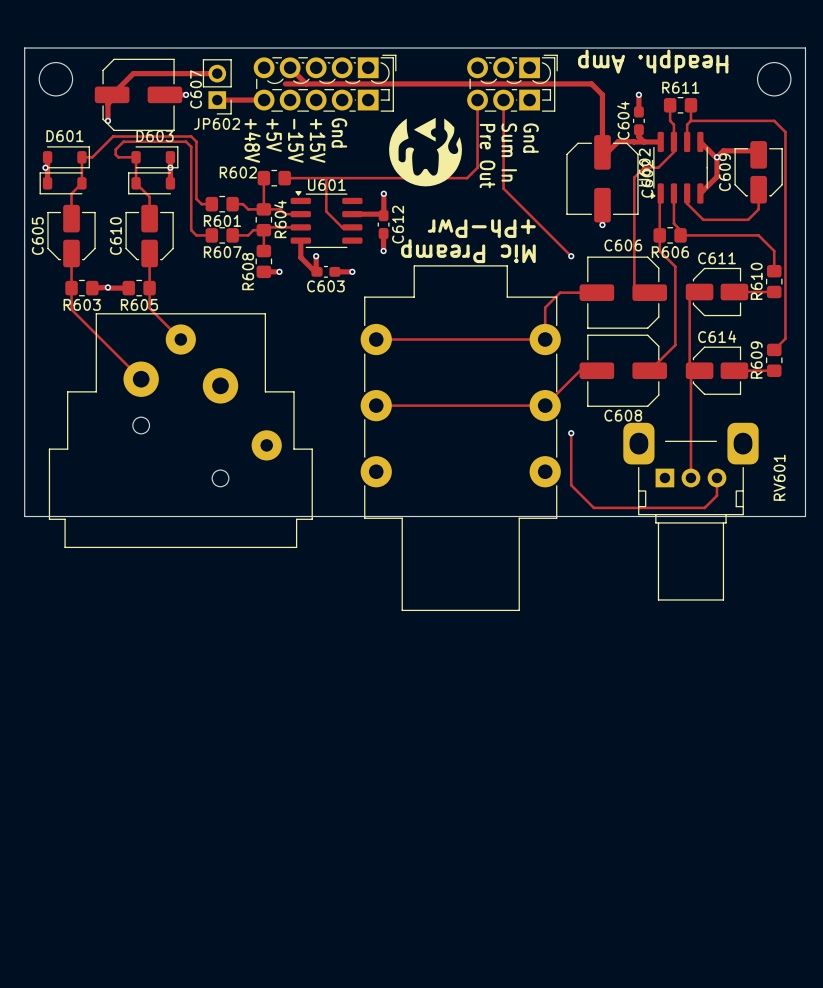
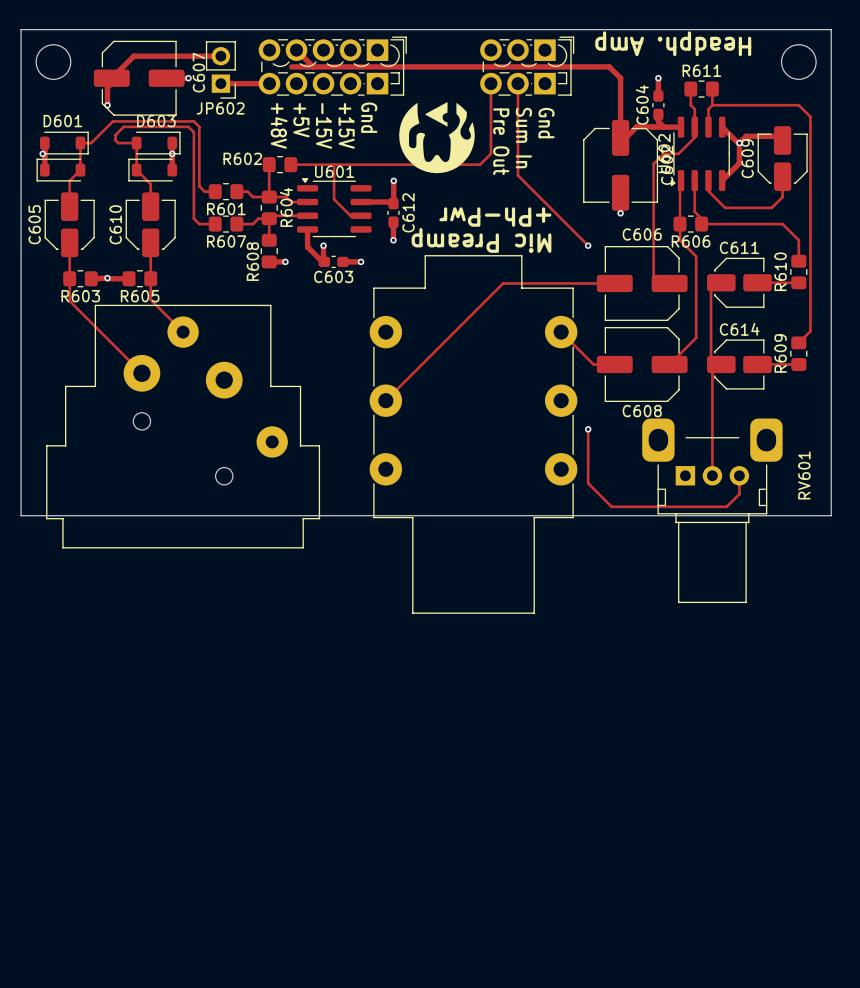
text: Gnd (339, 132) -> +15V (346, 125)
text: none -> Gnd (369, 117)
text: +5V (274, 135) -> +48V (279, 125)
text: +48V (252, 140) -> none
text: -15V (295, 140) -> +5V (301, 120)
text: +15V (317, 140) -> -15V (324, 125)
track: (560, 292) (545, 307) (545, 339) (376, 339) -> (576, 283) (503, 283) (385, 400)
track: (580, 370) (545, 405) (376, 405) -> (597, 364) (593, 364) (561, 332)

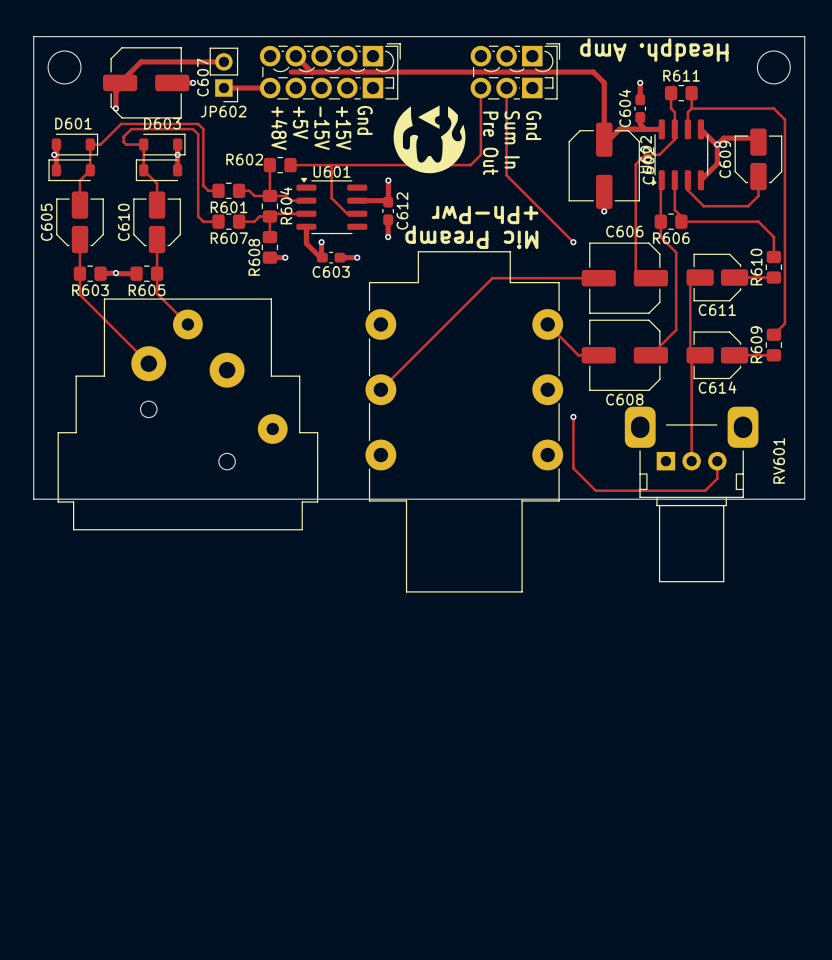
C611 rotation: 0° (739, 282) -> 180° (717, 277)
C614 rotation: 0° (739, 364) -> 180° (717, 355)

